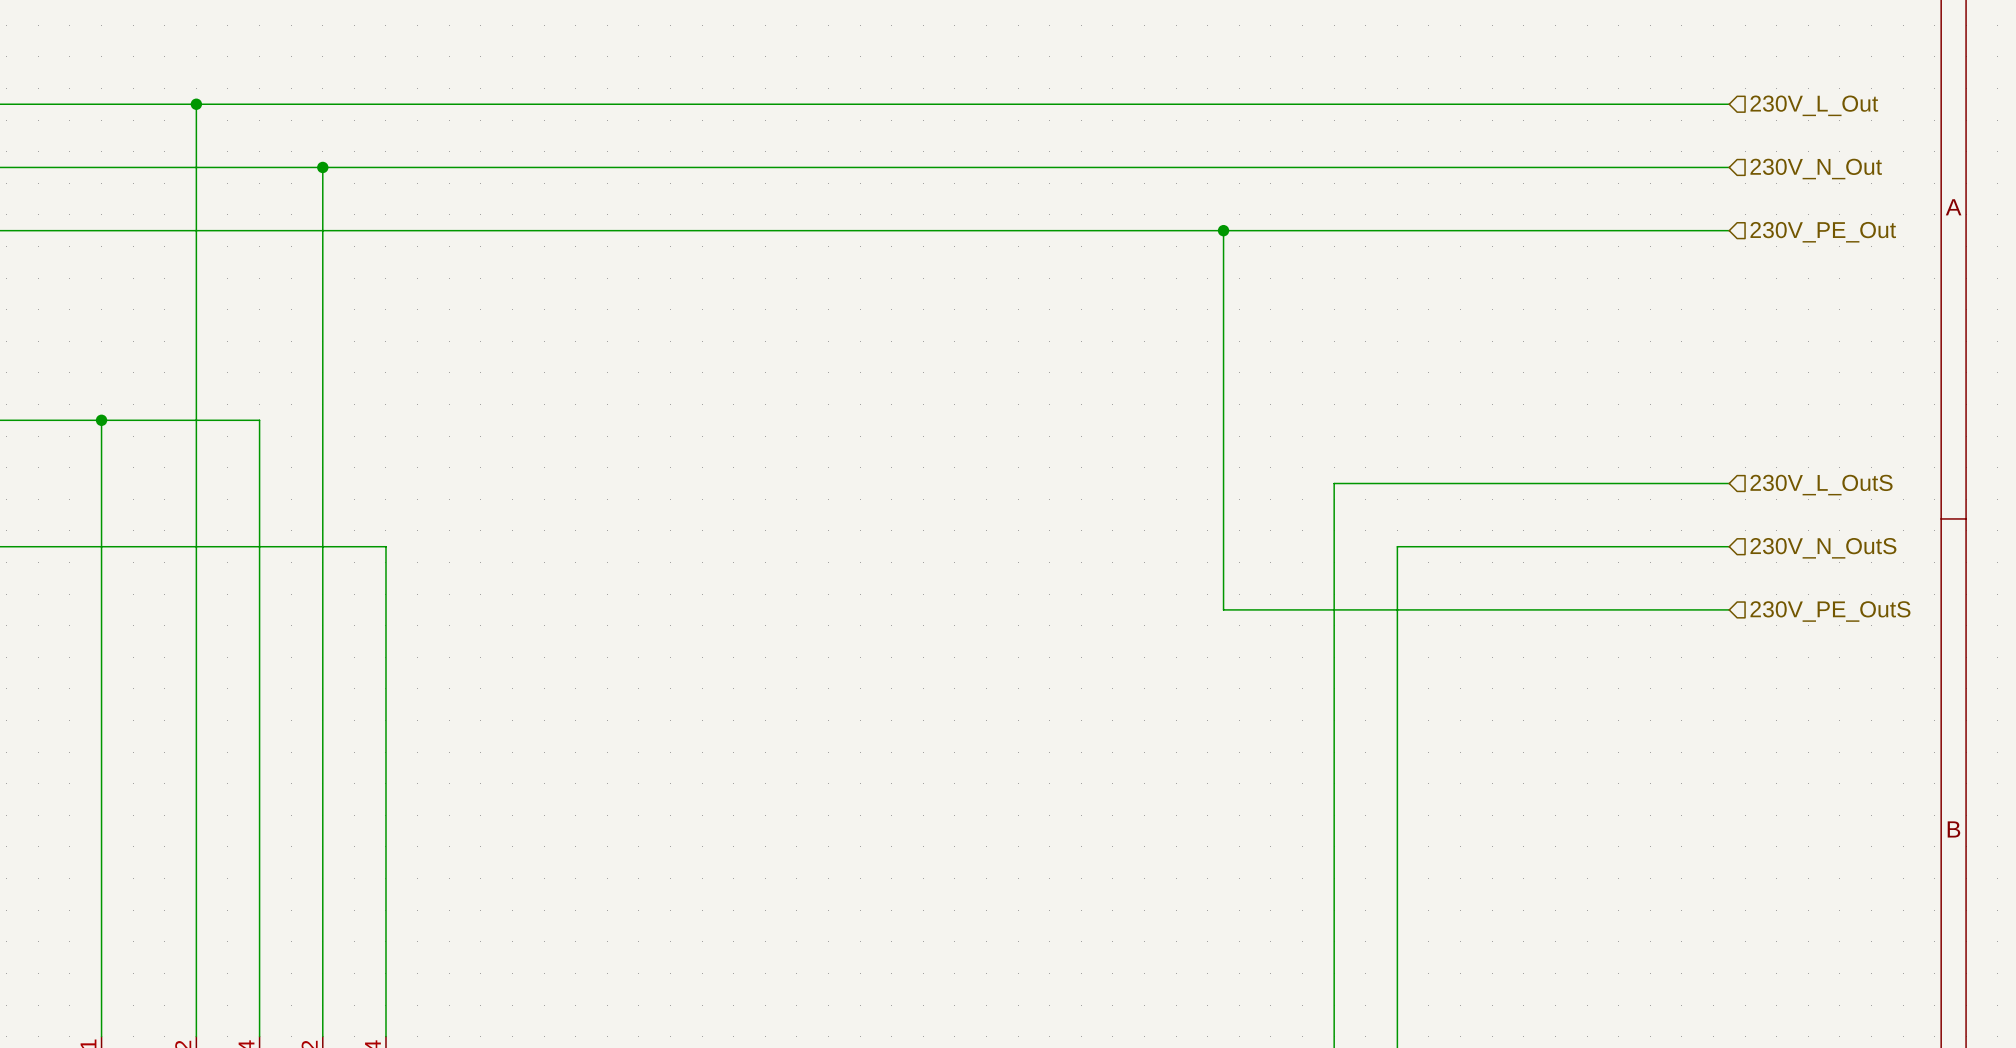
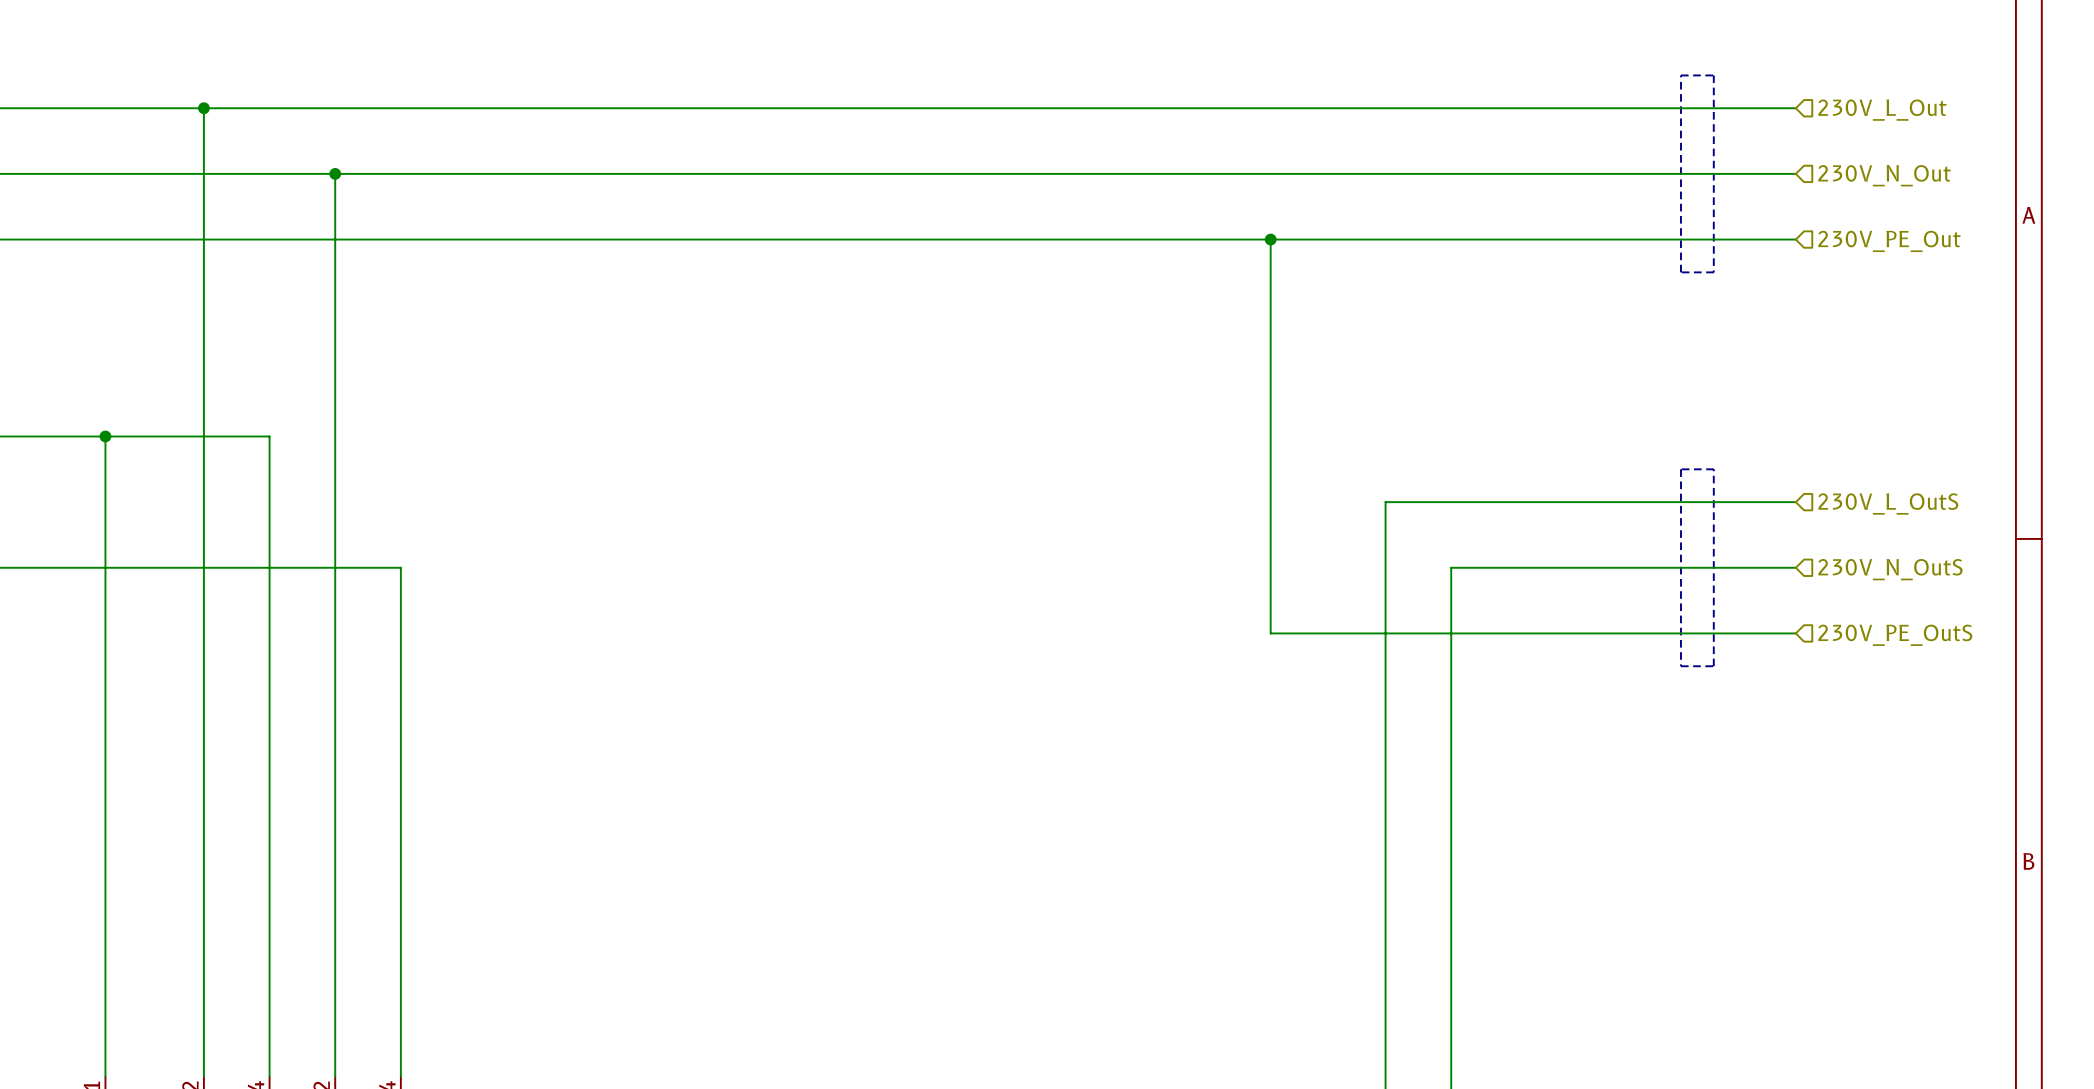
line: none -> (1680, 75) (1713, 75) (1713, 272) (1680, 272) (1680, 75)
line: none -> (1680, 469) (1680, 666) (1713, 666) (1713, 469) (1680, 469)

